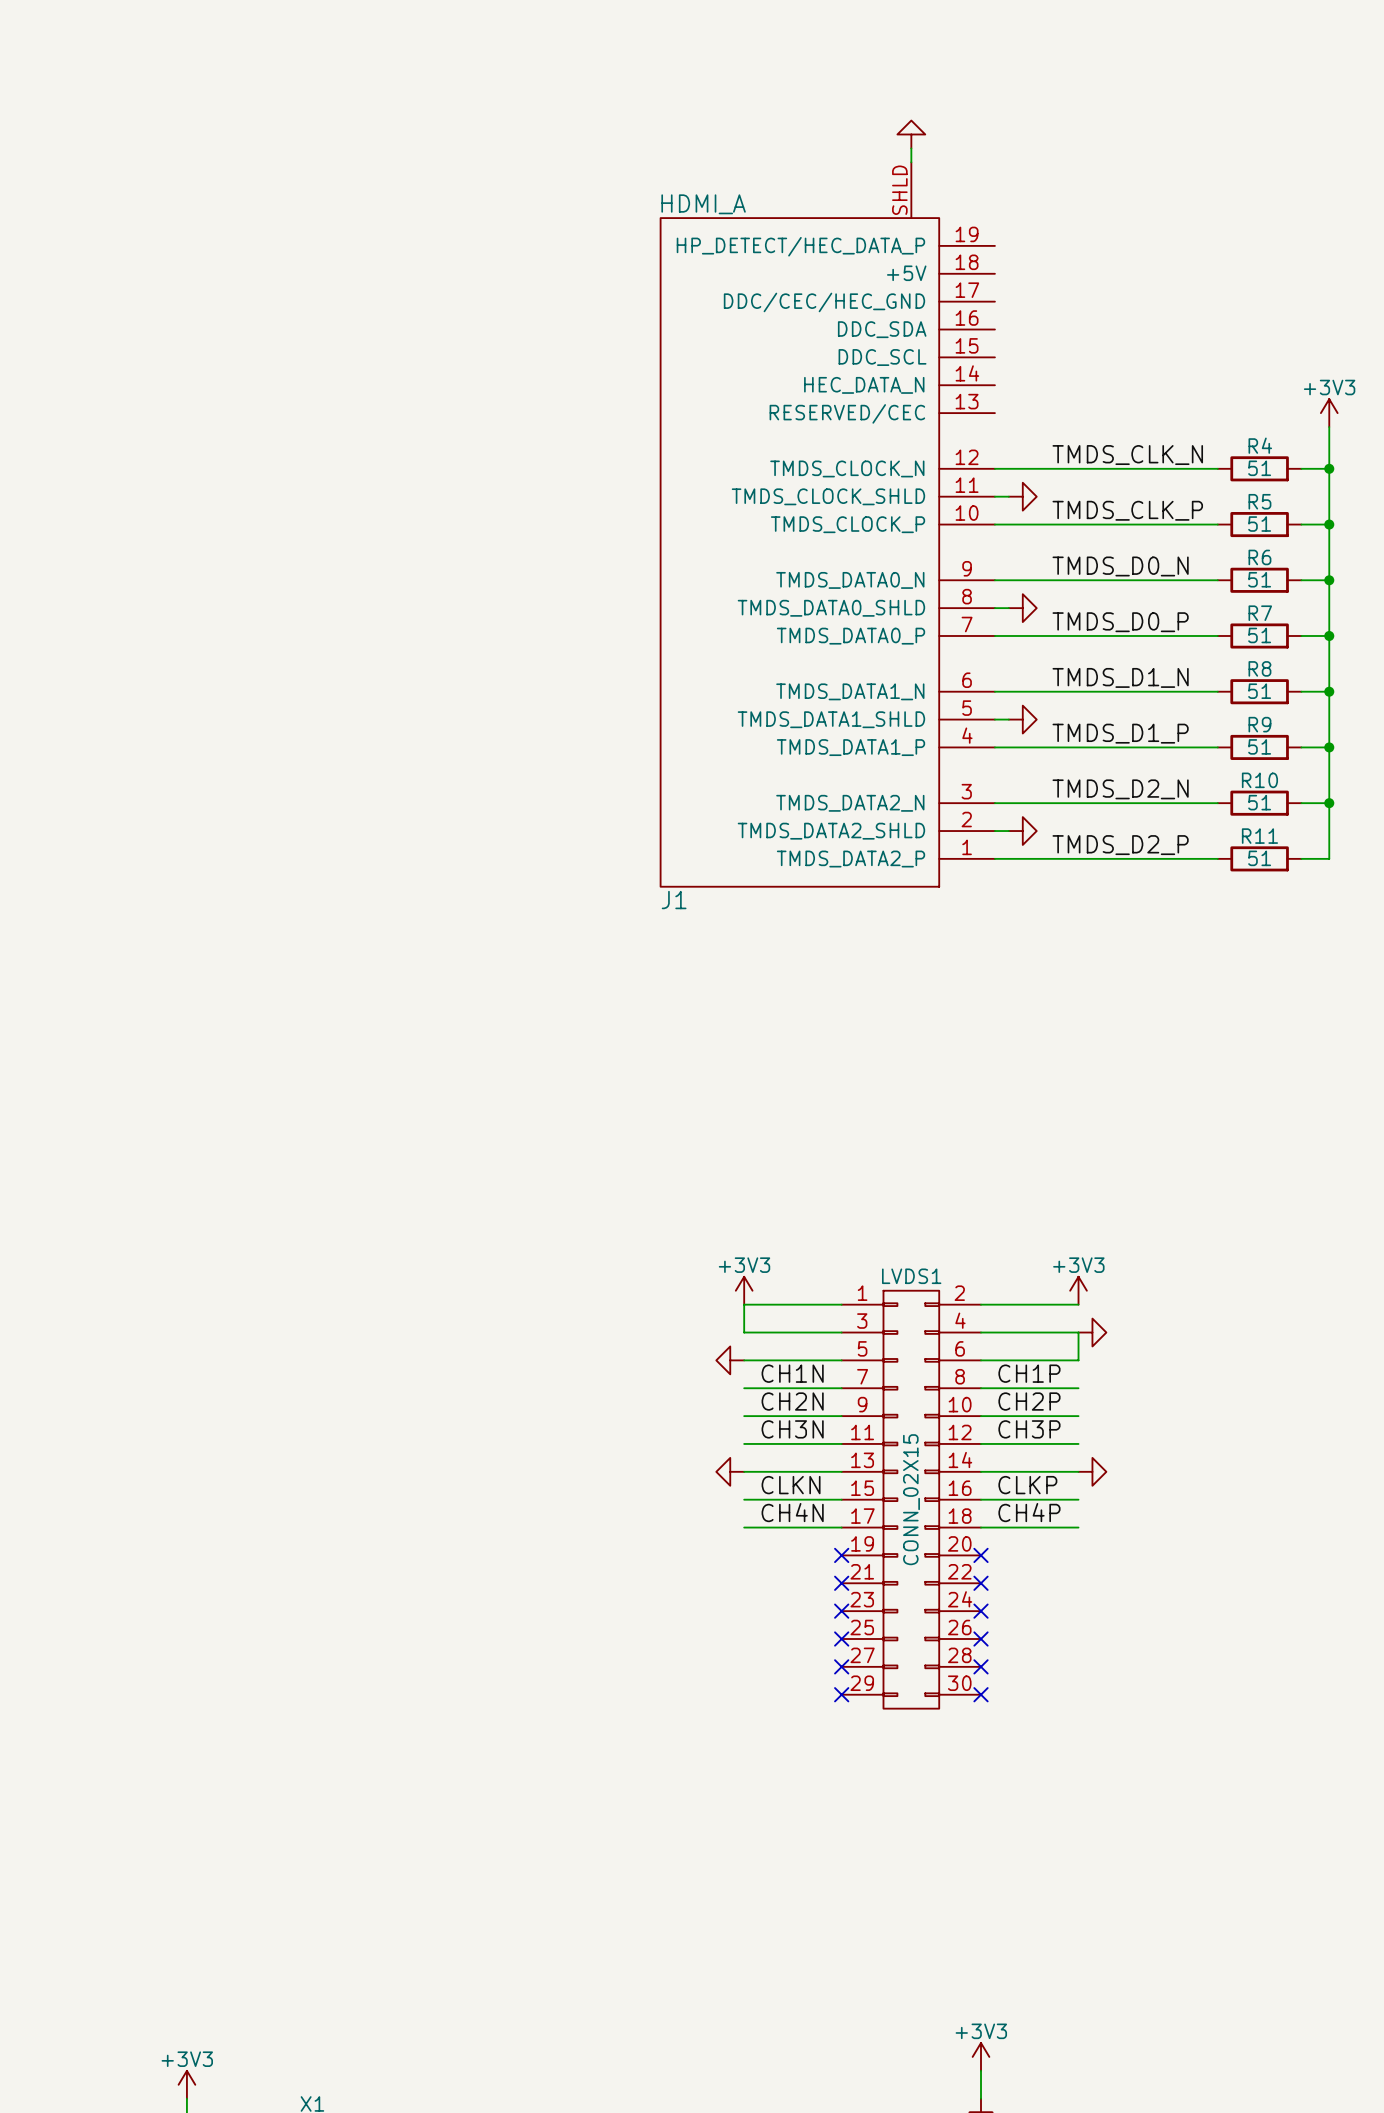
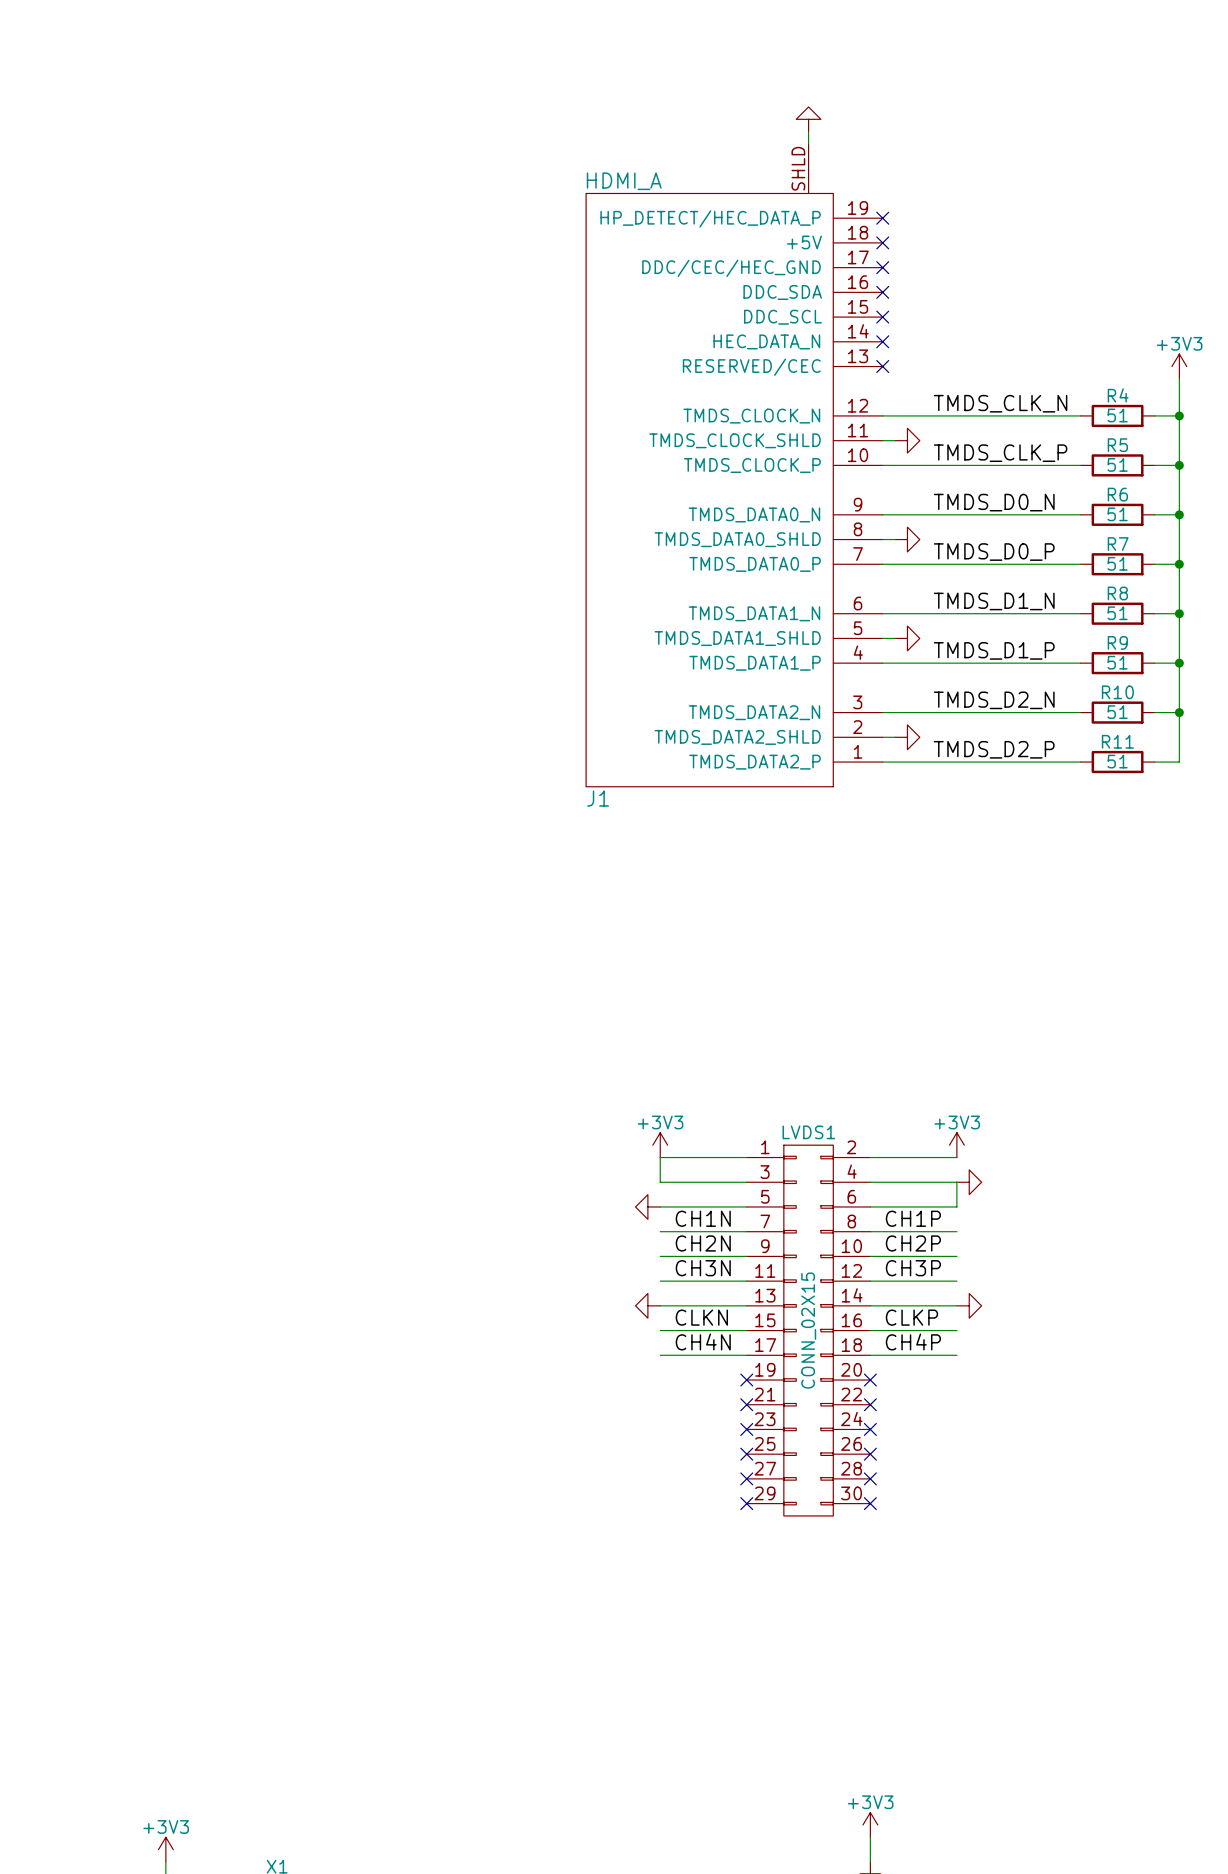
no-connect mark: none -> (882, 218)
no-connect mark: none -> (882, 242)
no-connect mark: none -> (882, 267)
no-connect mark: none -> (882, 292)
no-connect mark: none -> (882, 317)
no-connect mark: none -> (882, 341)
no-connect mark: none -> (882, 366)

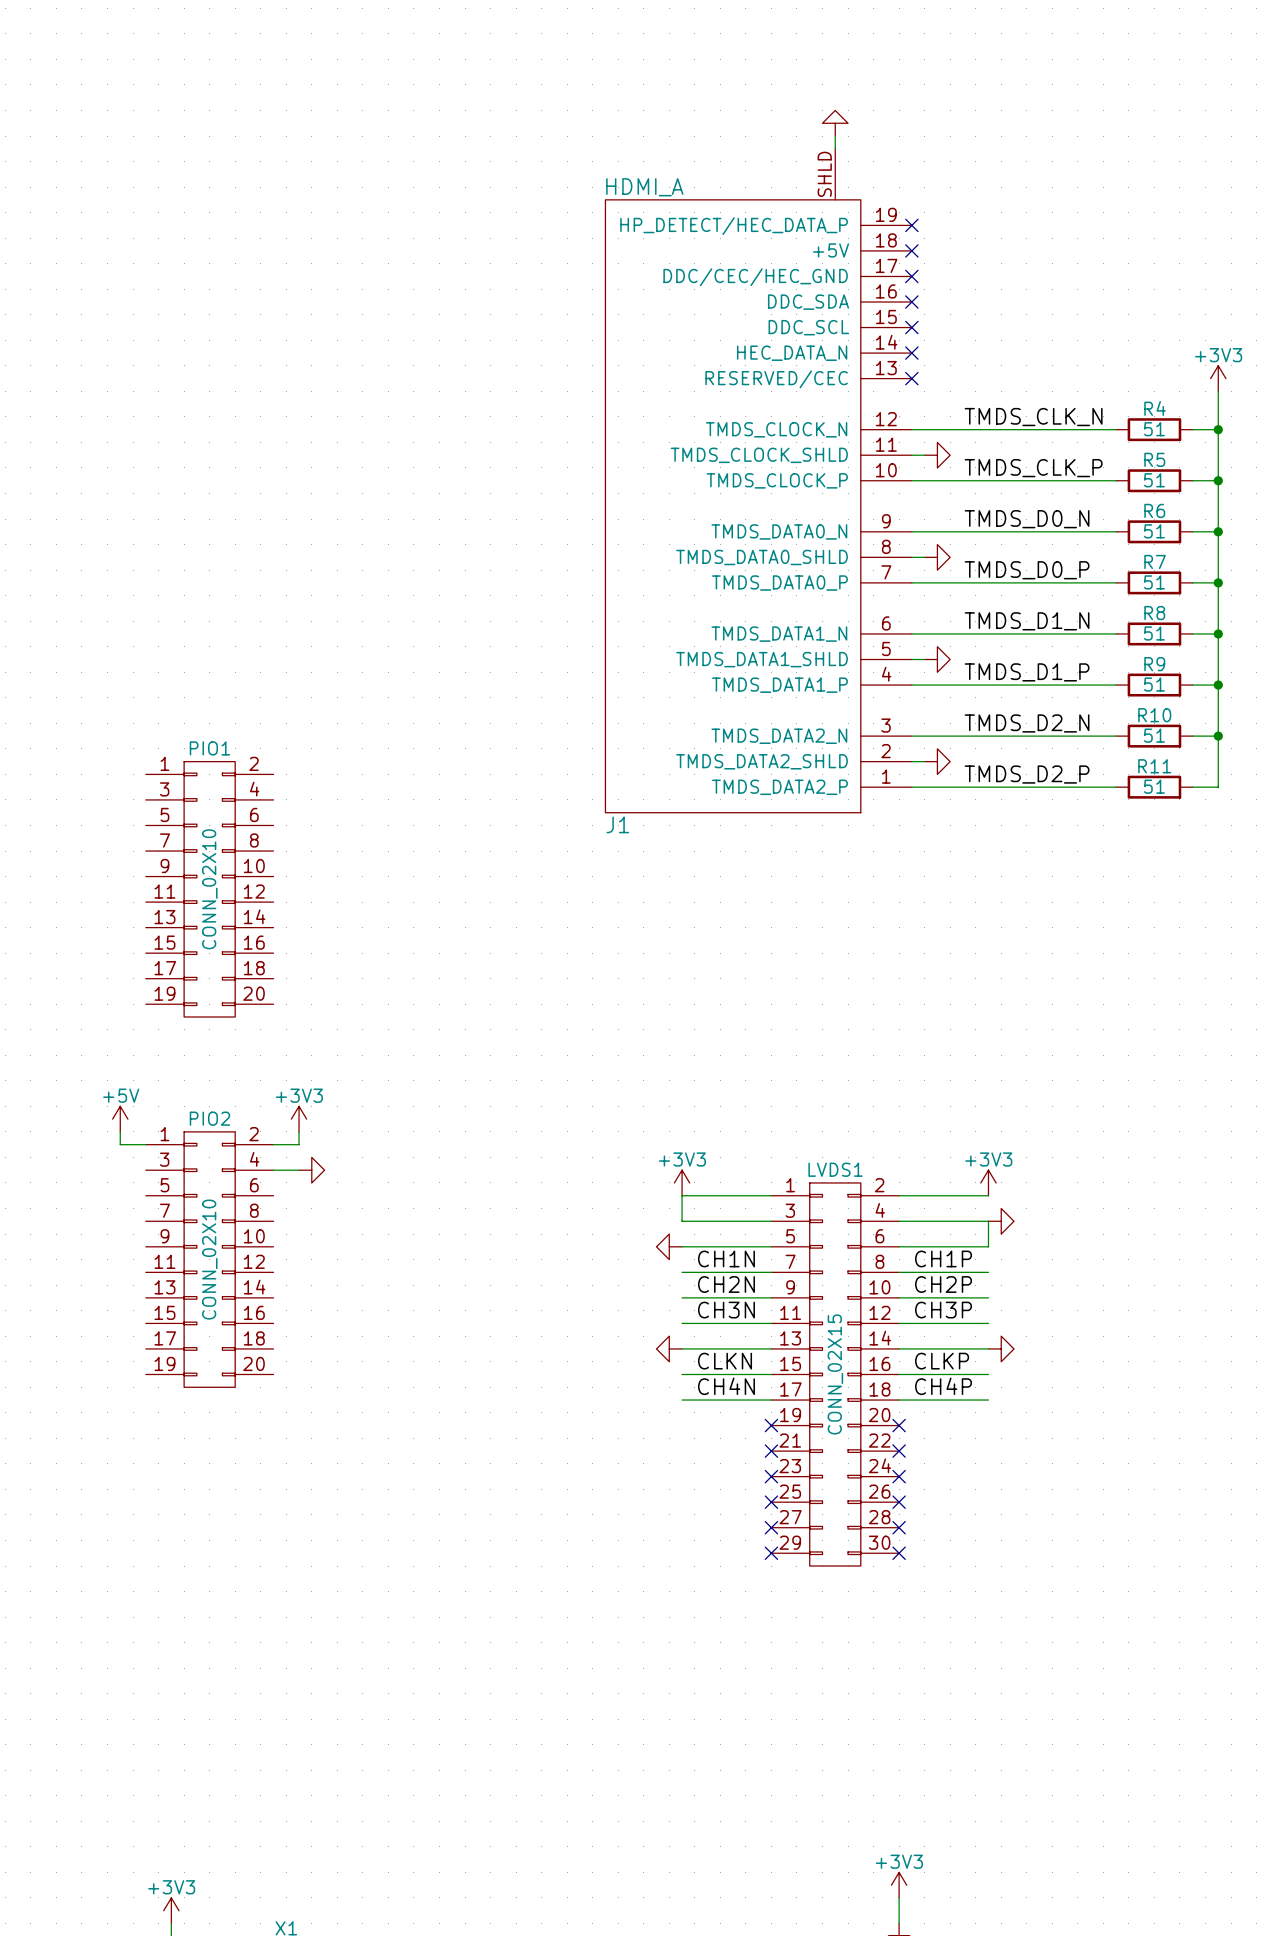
PIO1: none -> CONN_02X10 (209, 889)
power symbol: none -> +5V (120, 1119)
power symbol: none -> +3V3 (299, 1119)
wire: none -> (120, 1131) (120, 1144) (145, 1144)
wire: none -> (299, 1131) (299, 1144) (273, 1144)
wire: none -> (273, 1170) (299, 1170)
power symbol: none -> (311, 1170)
PIO2: none -> CONN_02X10 (209, 1259)

